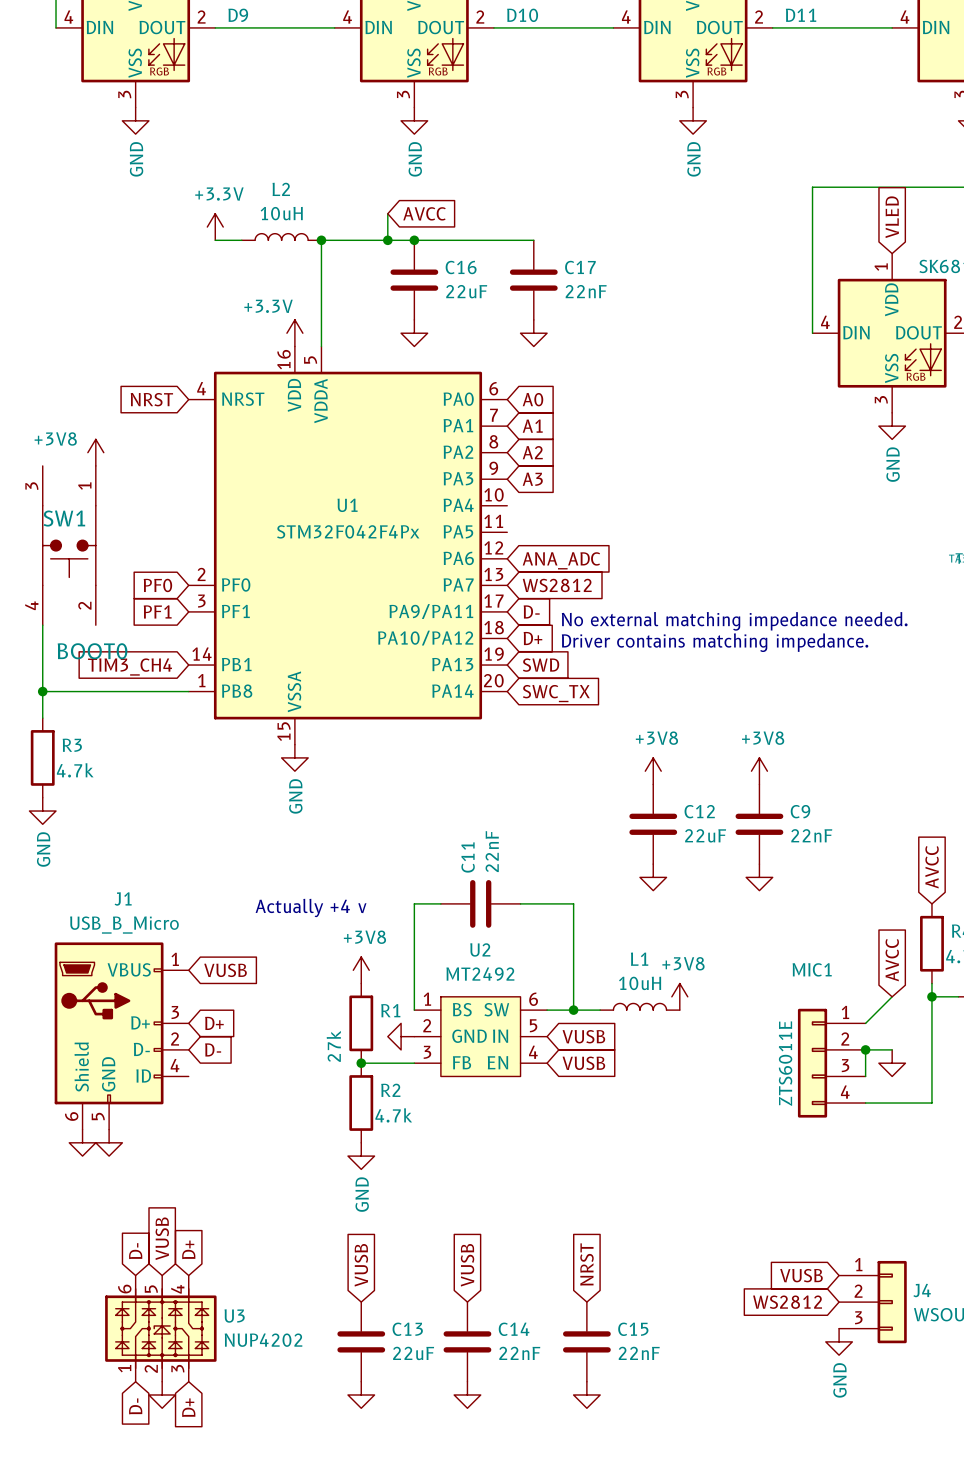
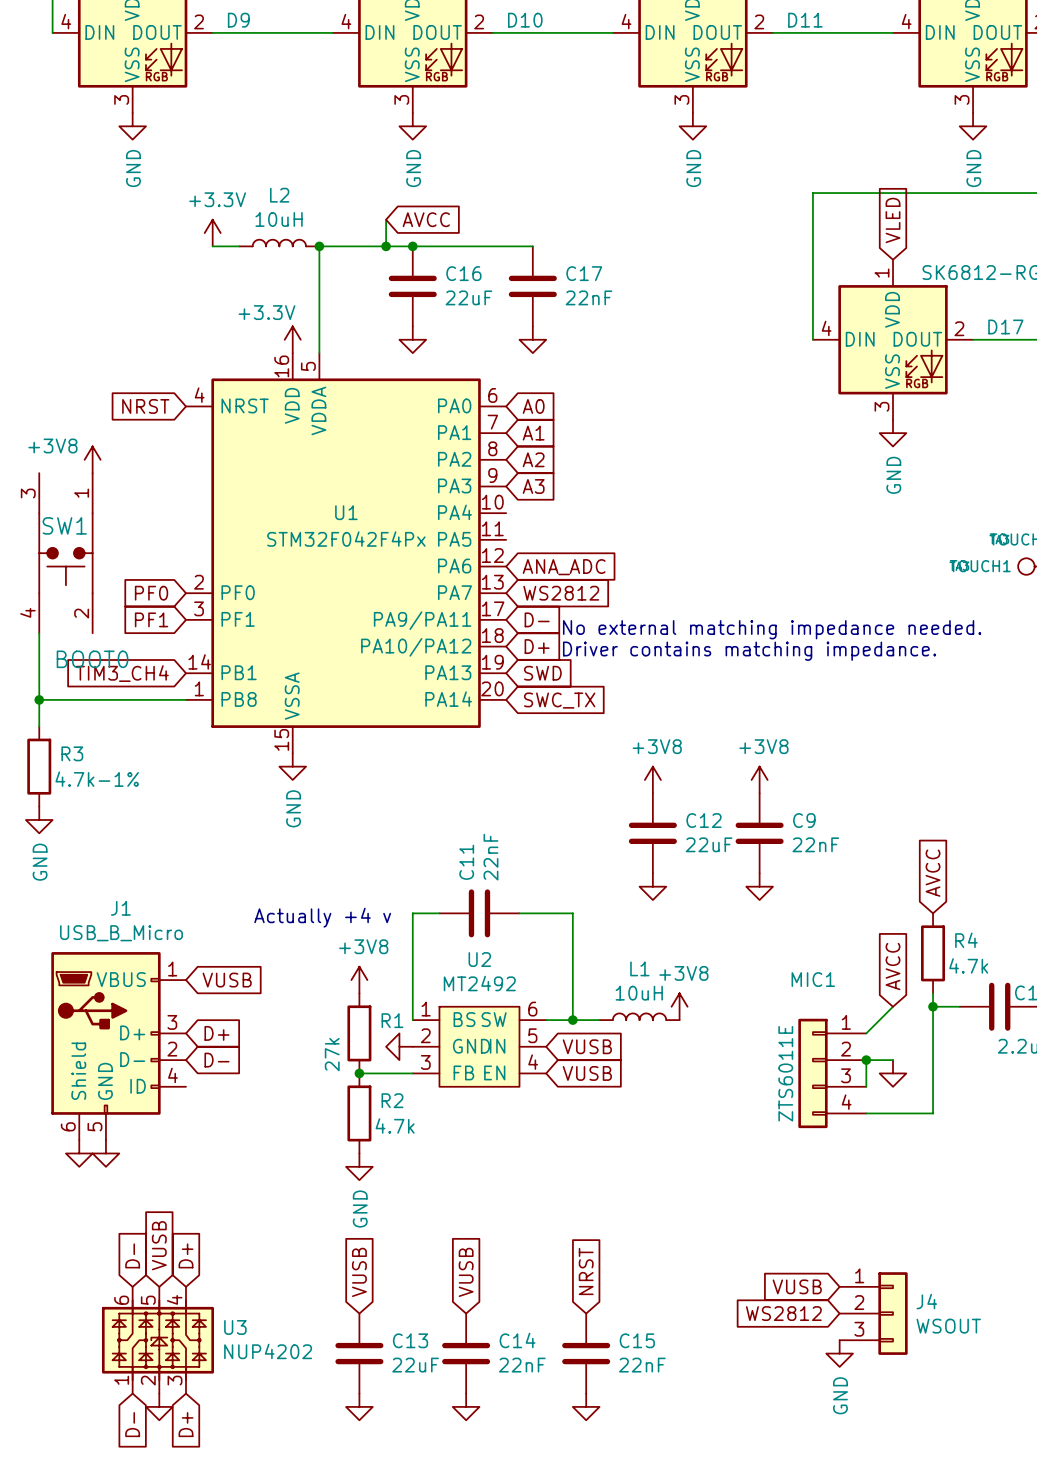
R3 value: 4.7k (75, 770) -> 4.7k-1% (97, 779)

